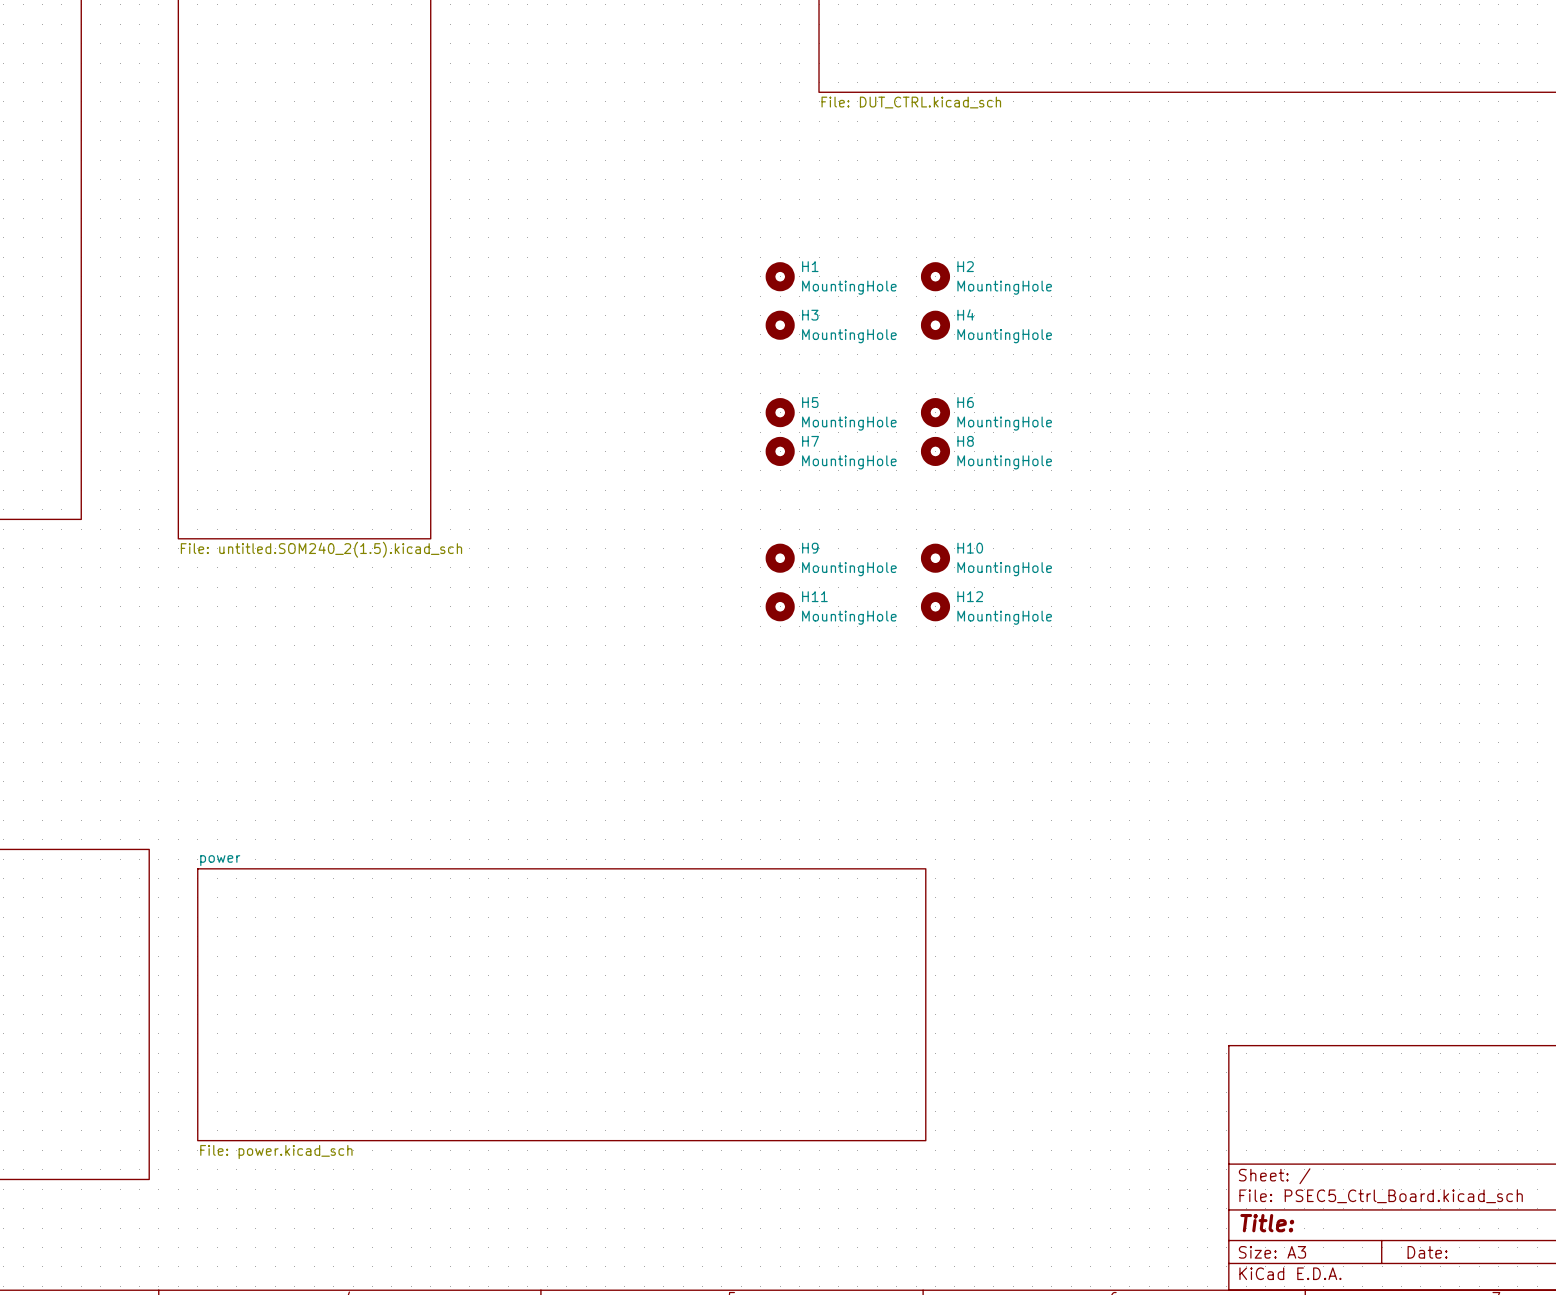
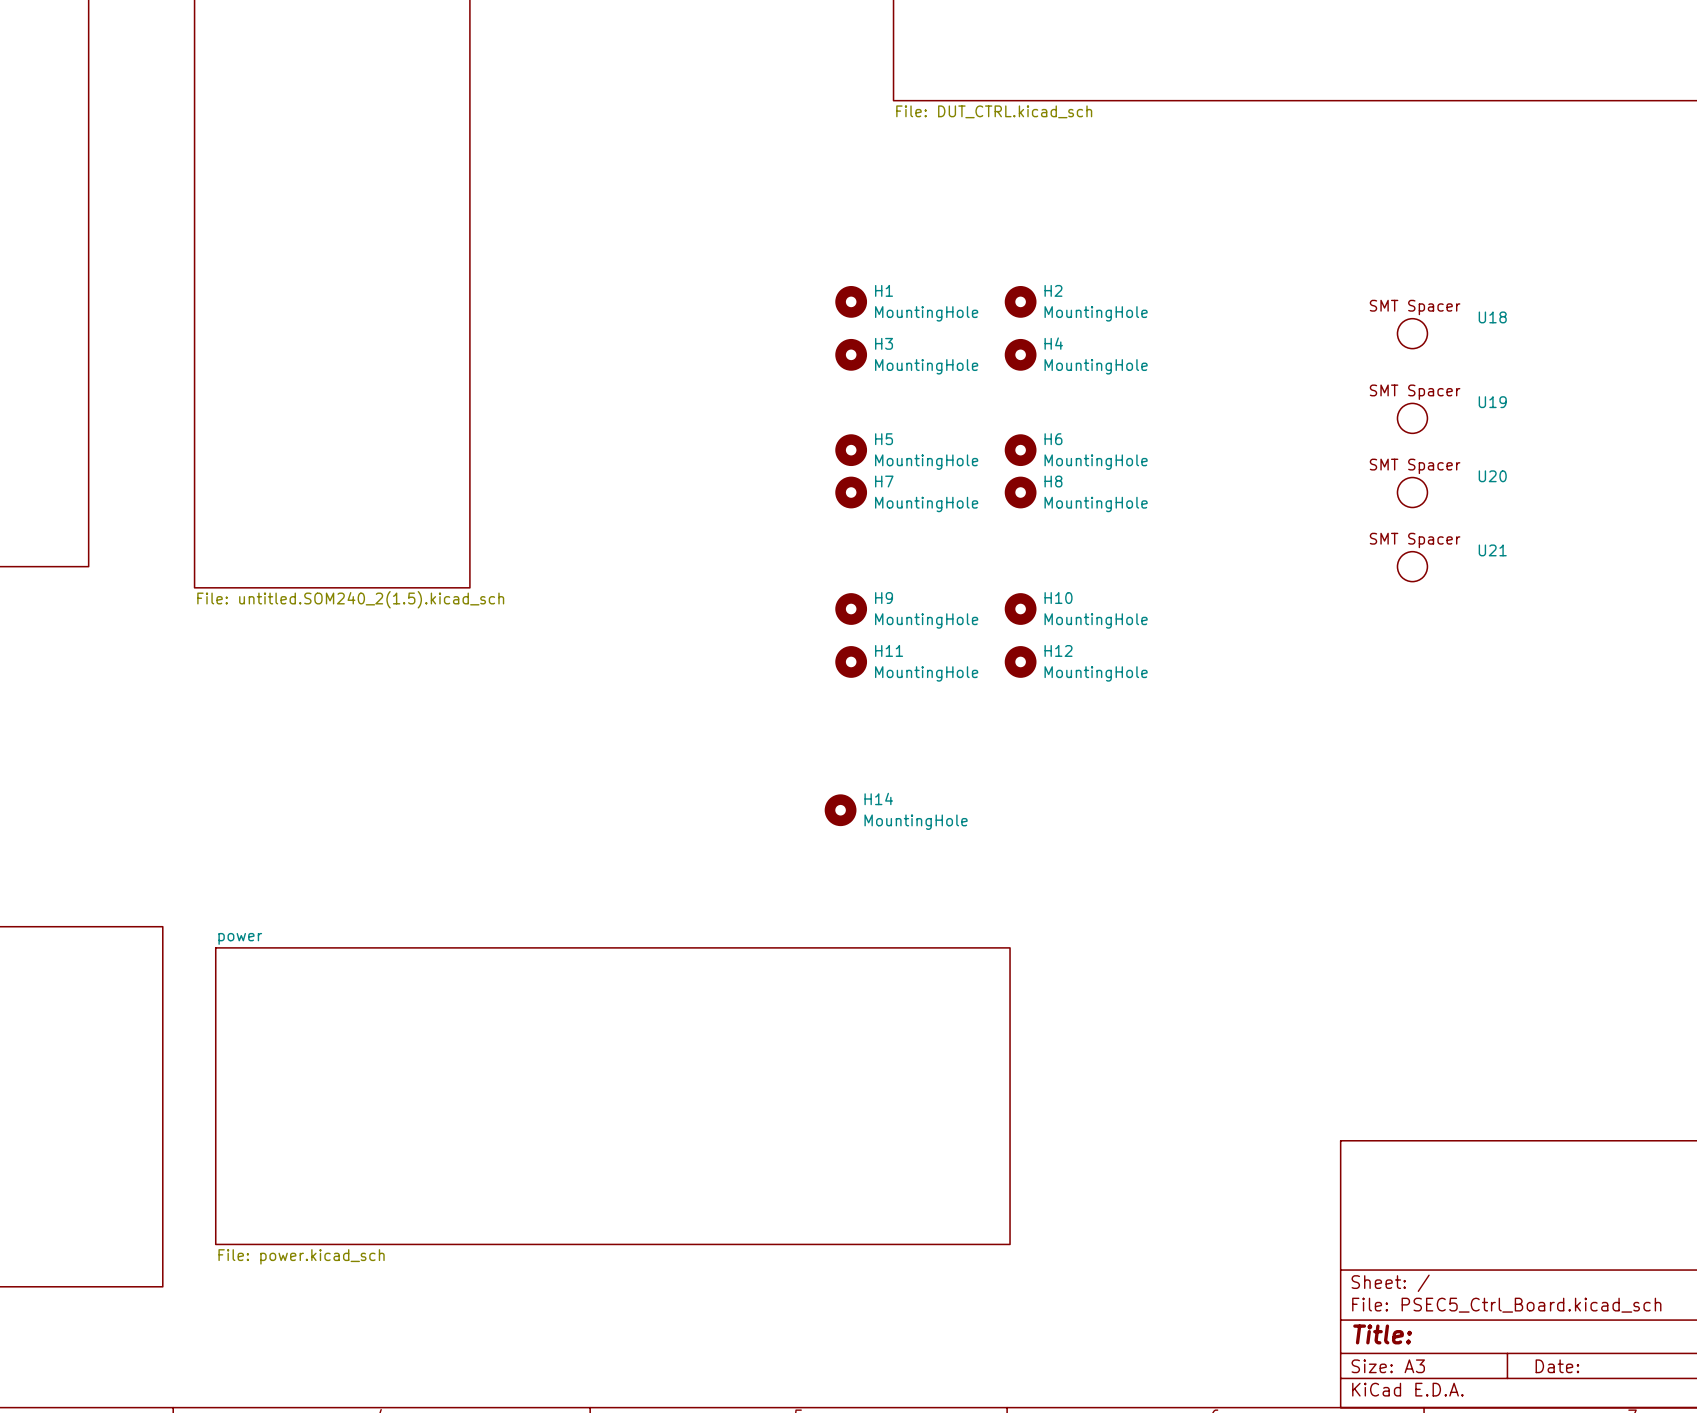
U18: none -> (1412, 333)
U19: none -> (1412, 418)
U20: none -> (1412, 492)
U21: none -> (1412, 566)
H14: none -> MountingHole (840, 810)

